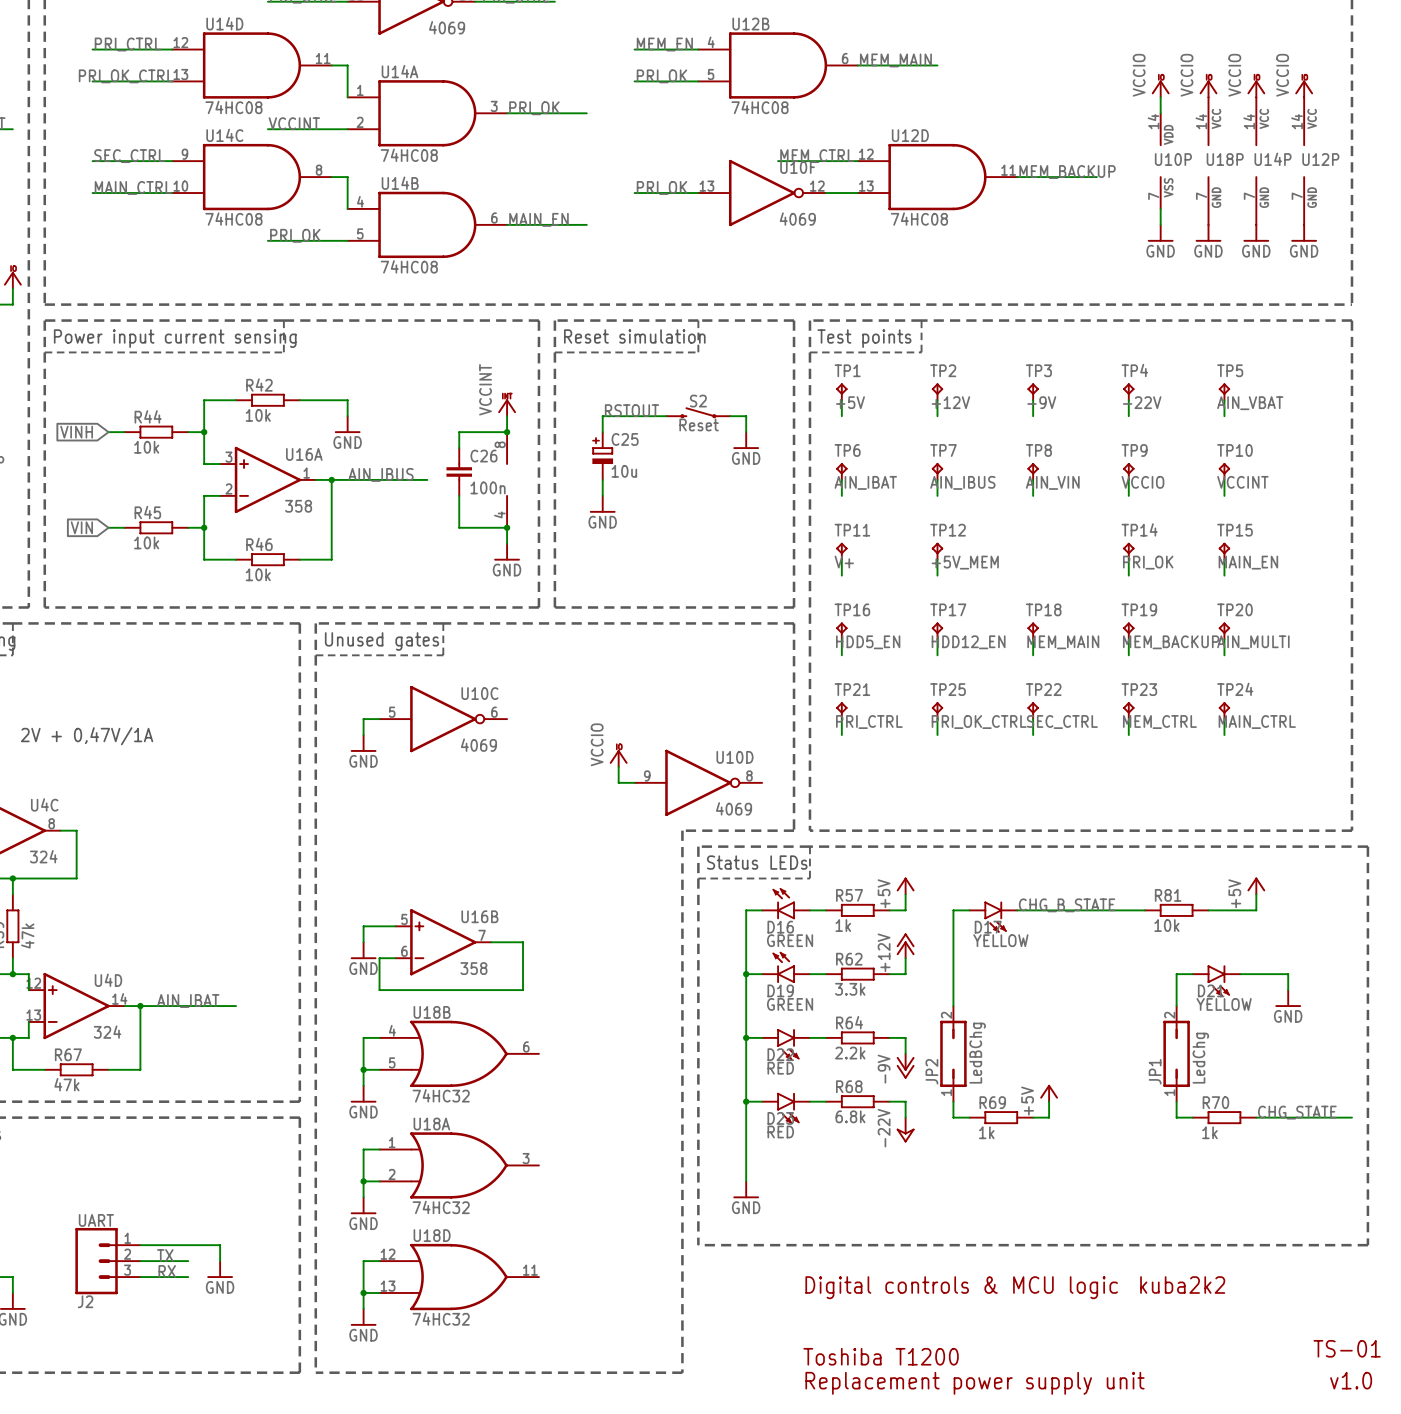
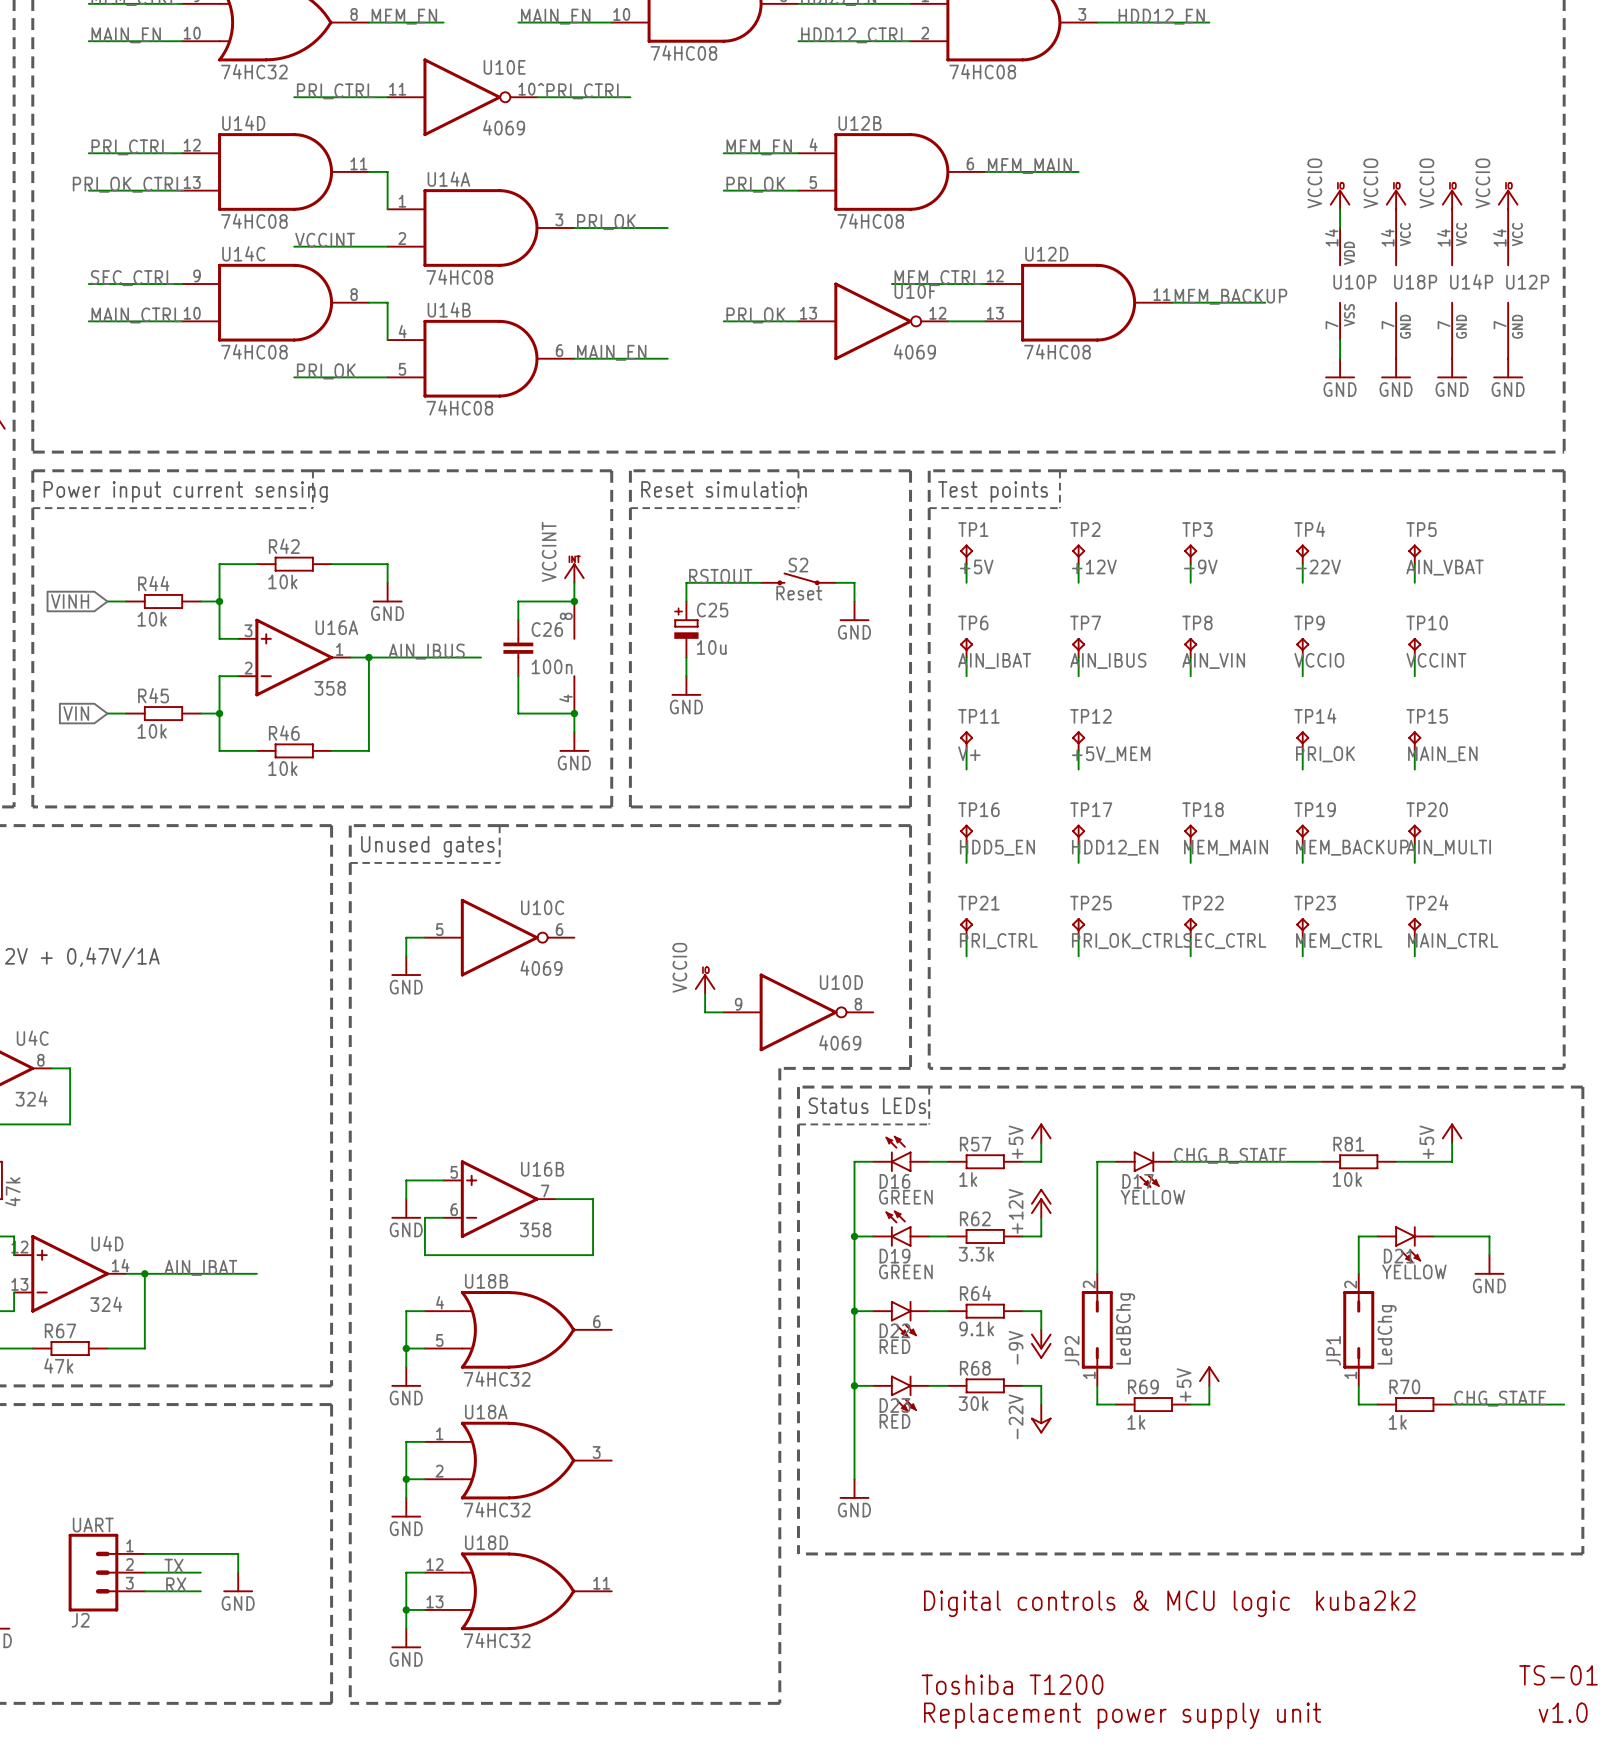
R64 value: 2.2k (850, 1053) -> 9.1k (976, 1328)
R68 value: 6.8k (850, 1116) -> 30k (973, 1403)

